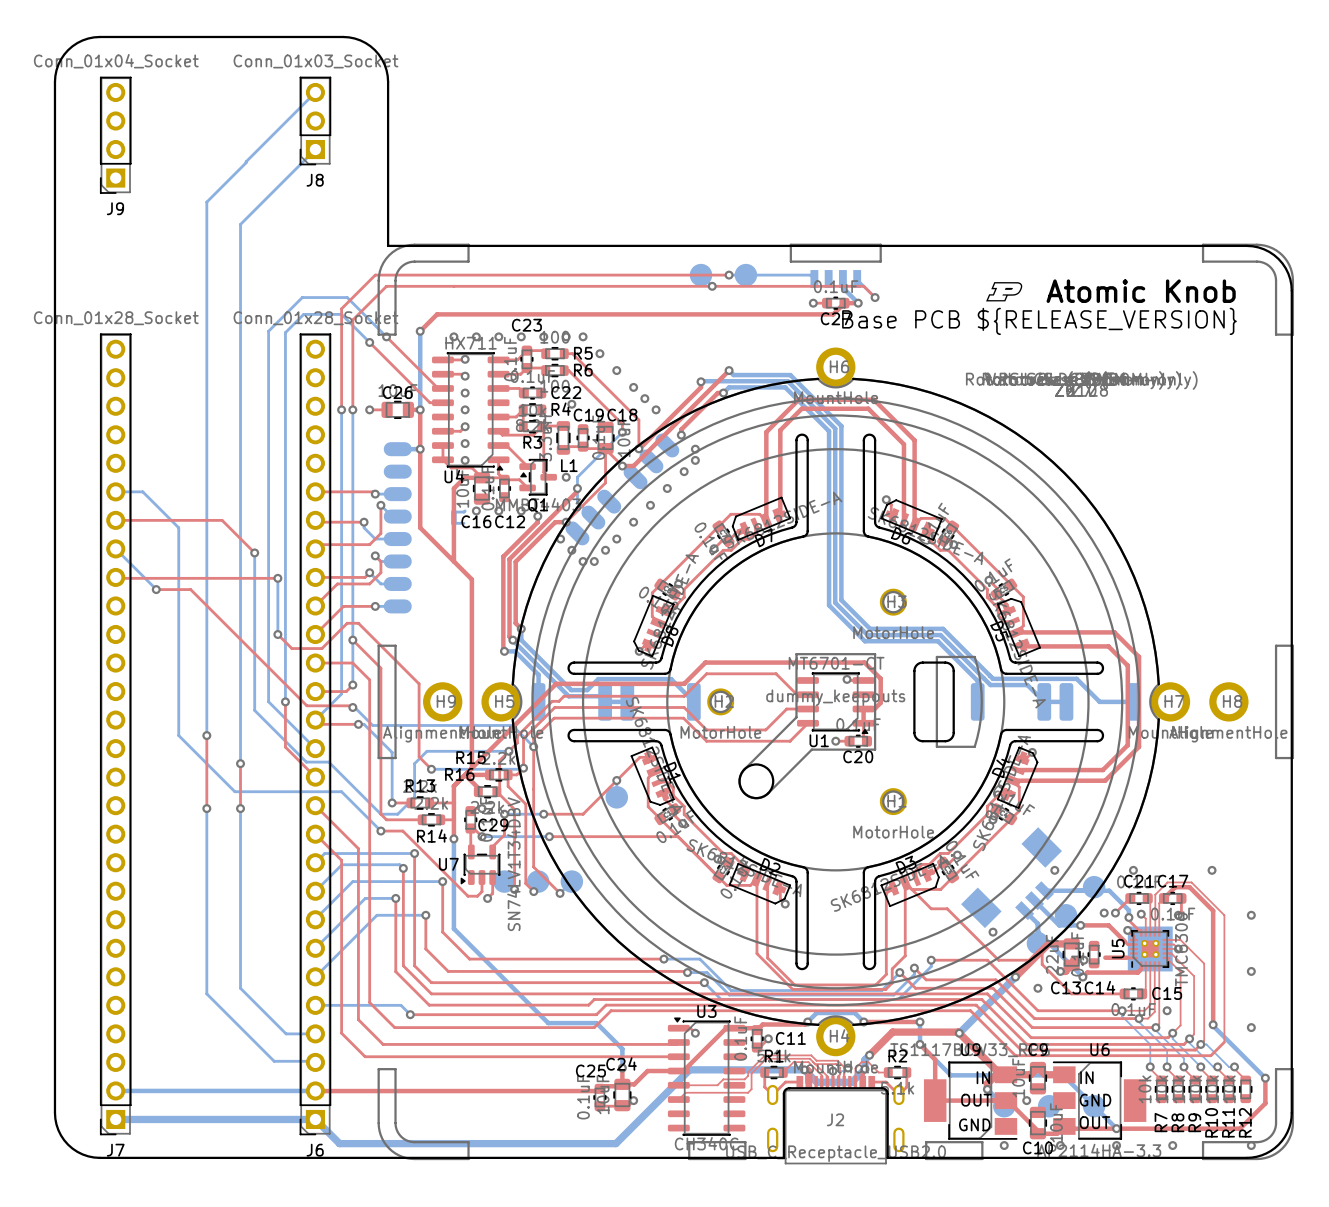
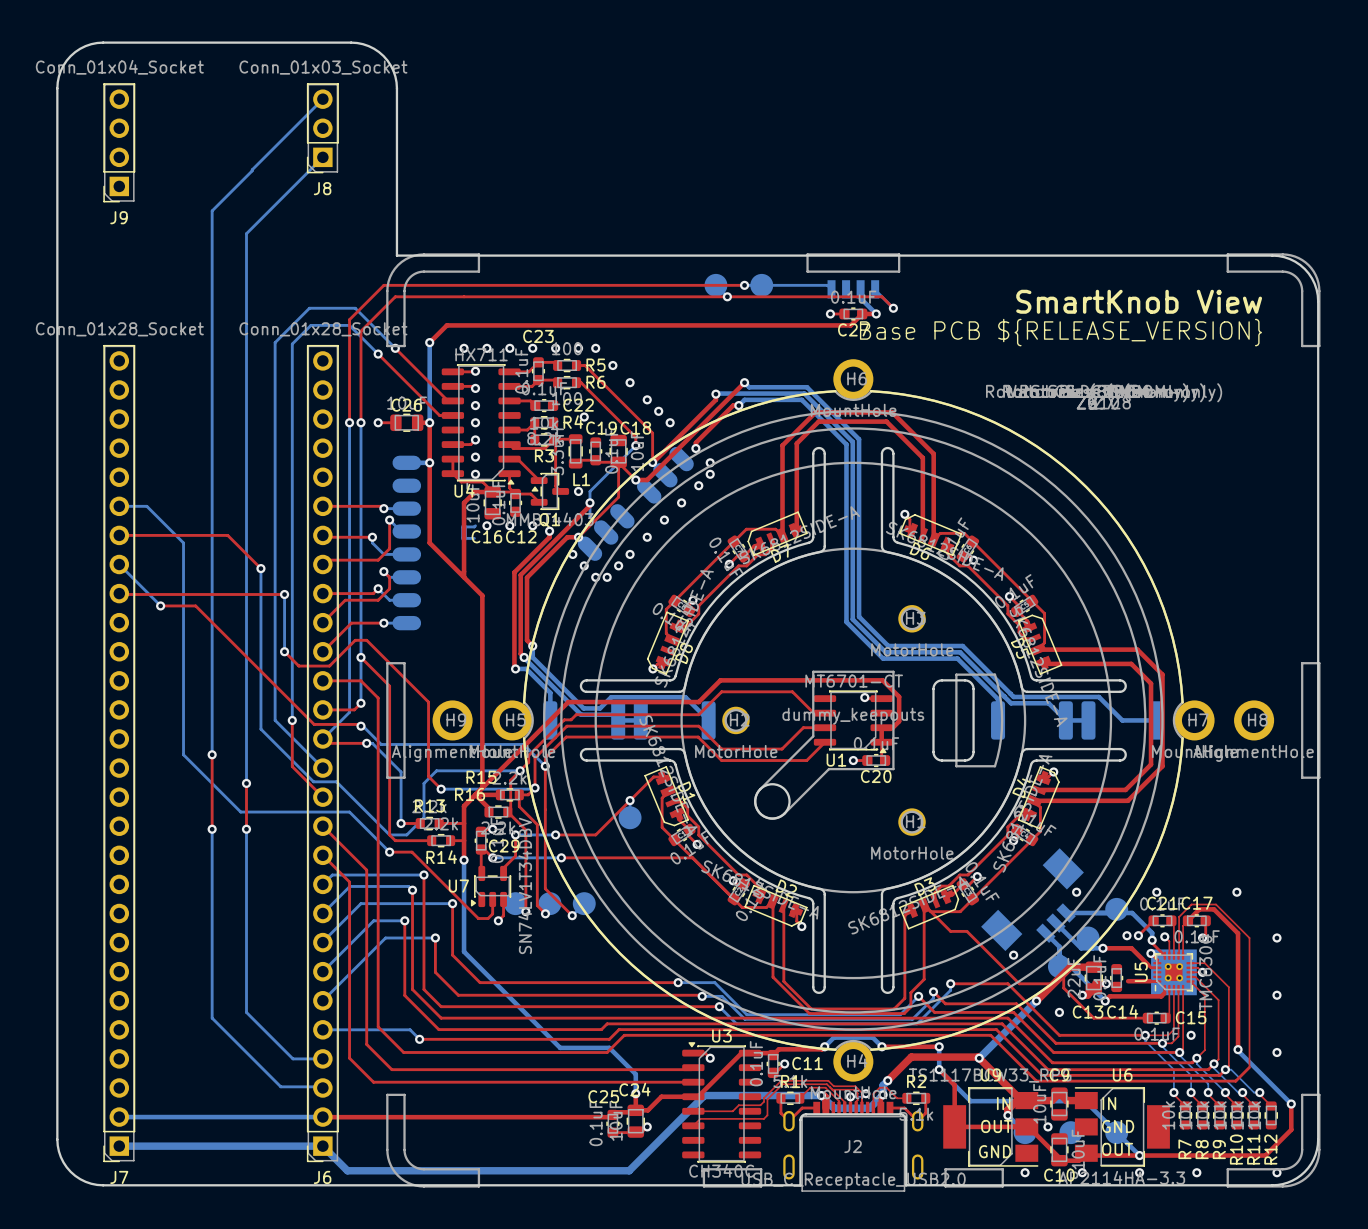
drawing: [986, 282, 1023, 302] -> none
text: Atomic Knob (1141, 291) -> SmartKnob View (1139, 301)

